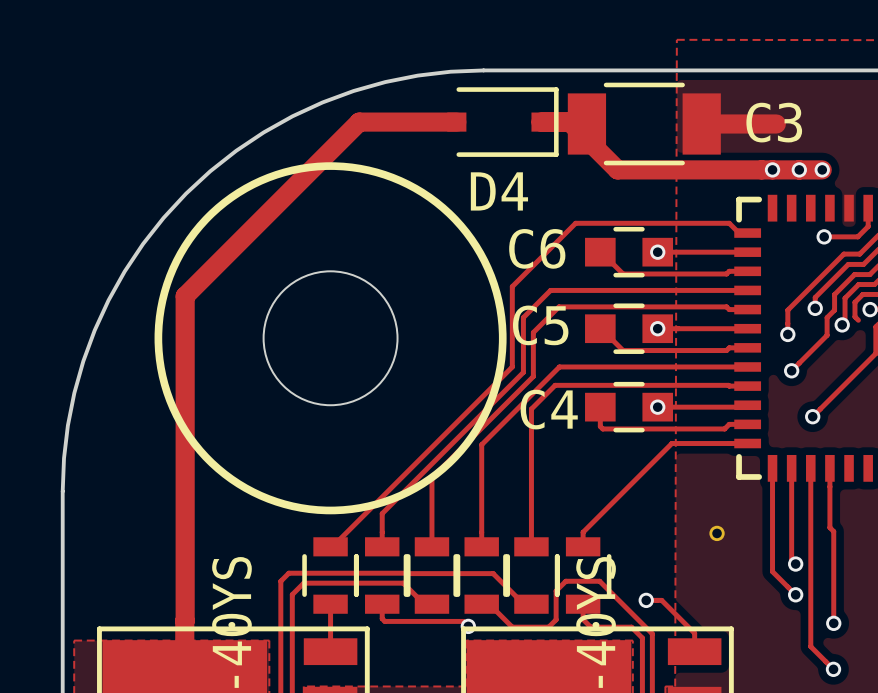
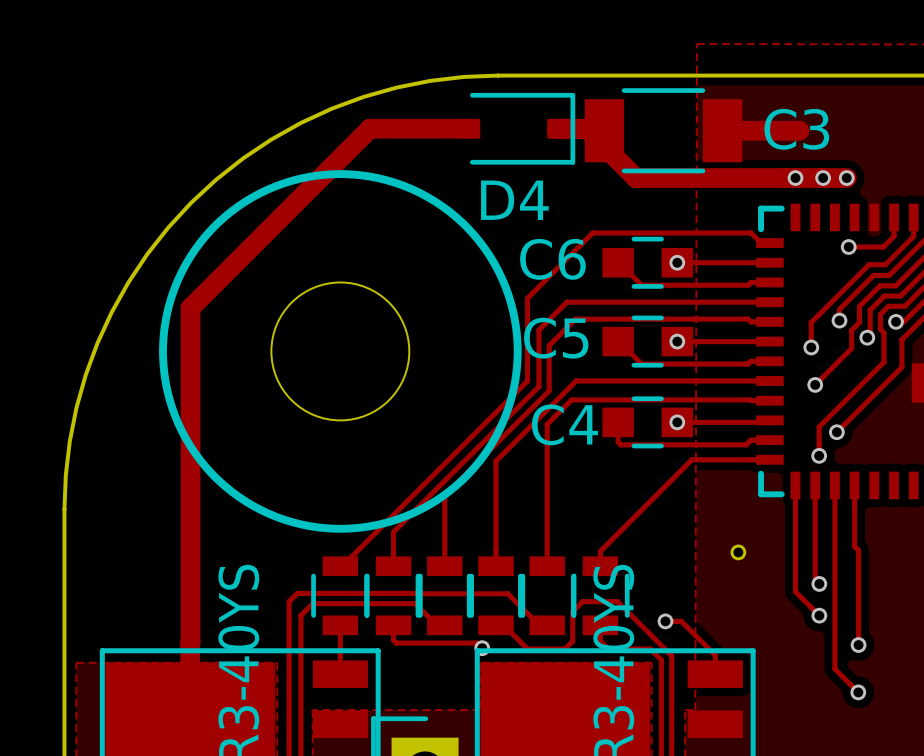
track: none -> (883, 332) (883, 362) (819, 426) (819, 455)
via: none -> (819, 455)

